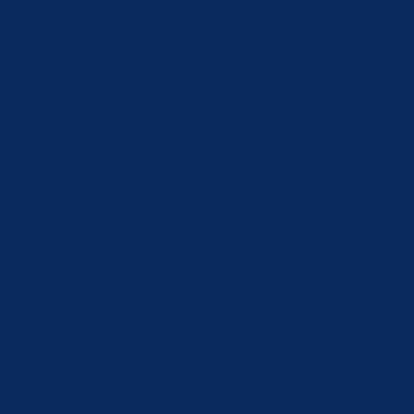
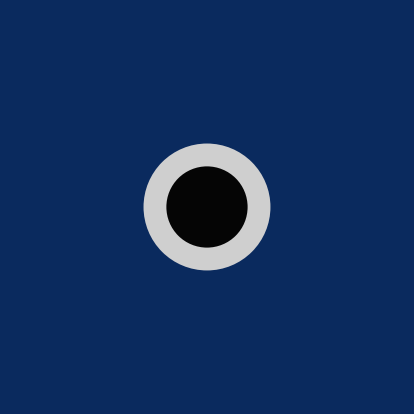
part: none -> (206, 206)

